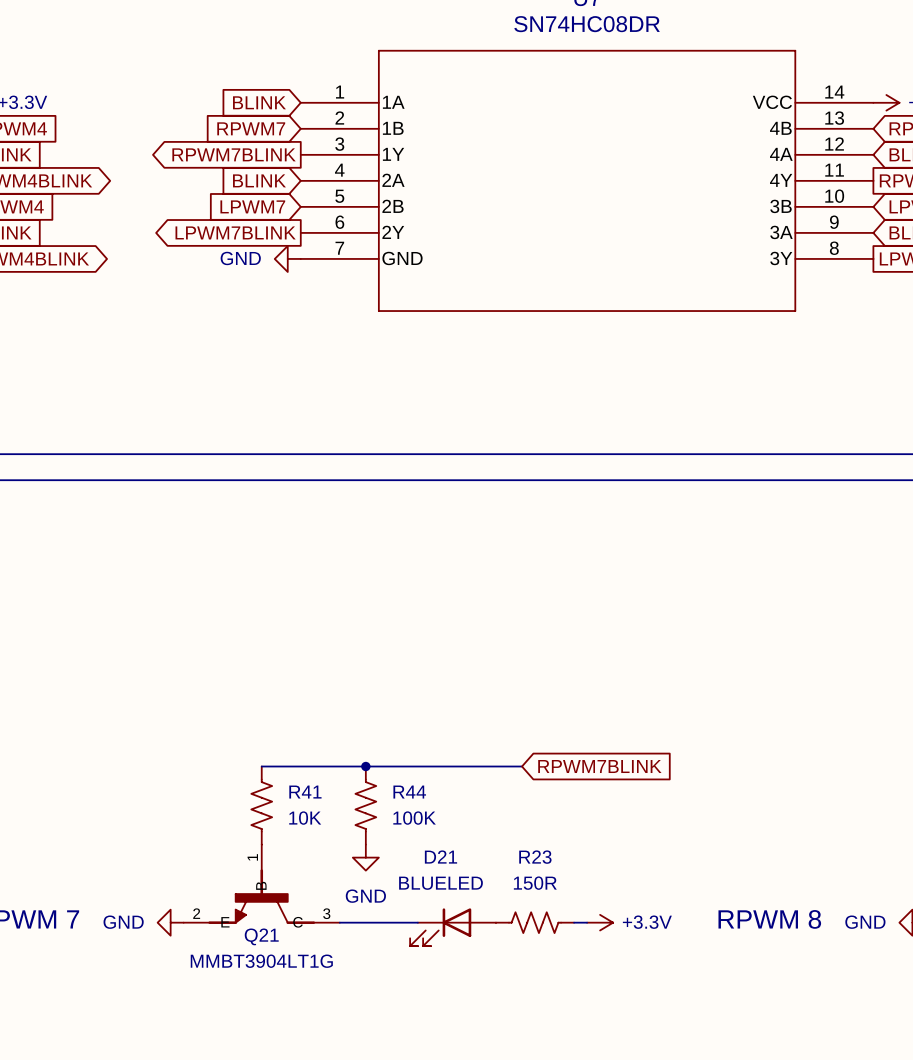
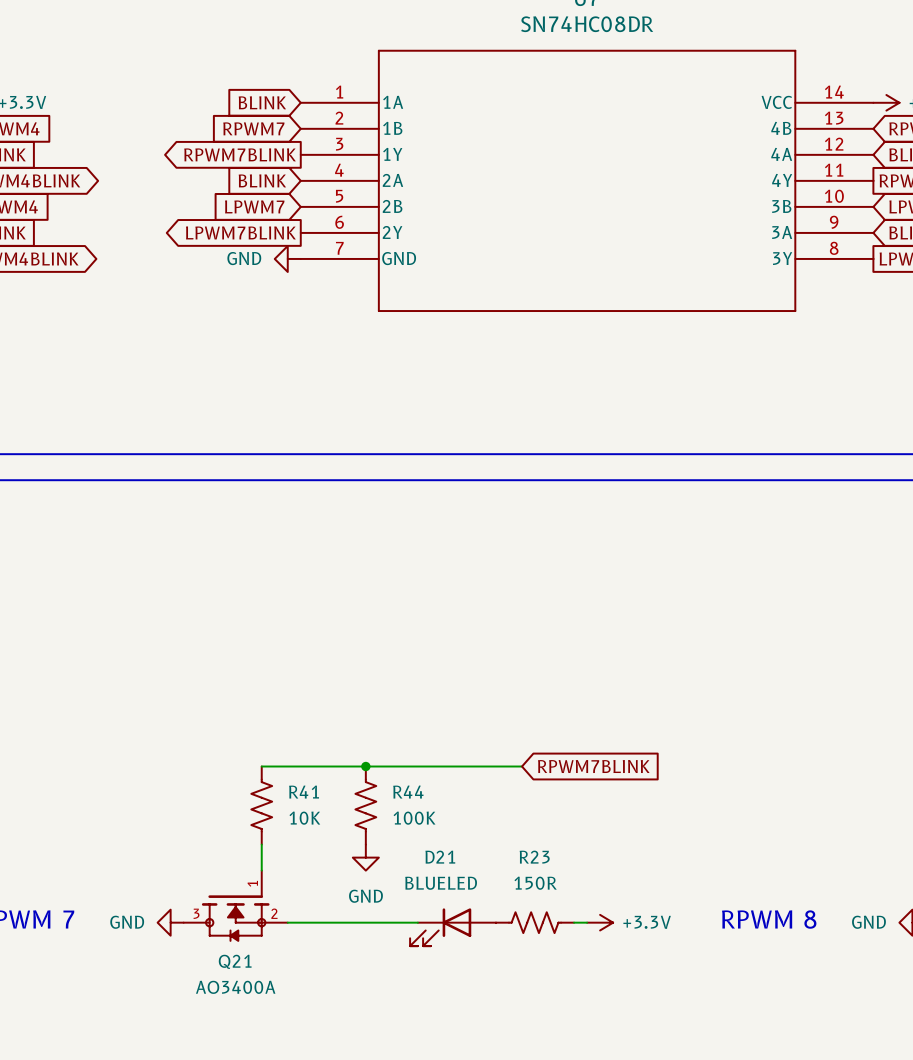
Q21 symbol: [183, 844, 340, 924] -> [183, 870, 288, 942]
Q21 value: MMBT3904LT1G (261, 961) -> AO3400A (235, 987)

